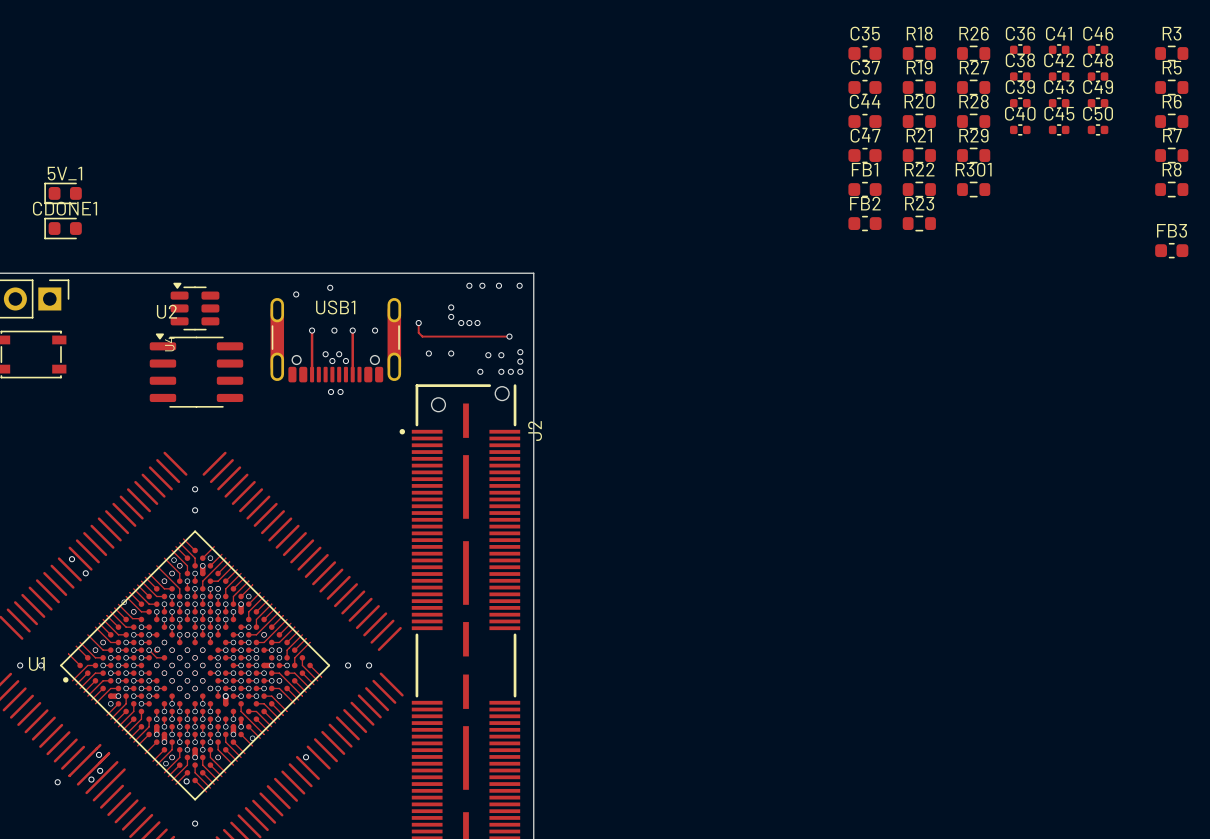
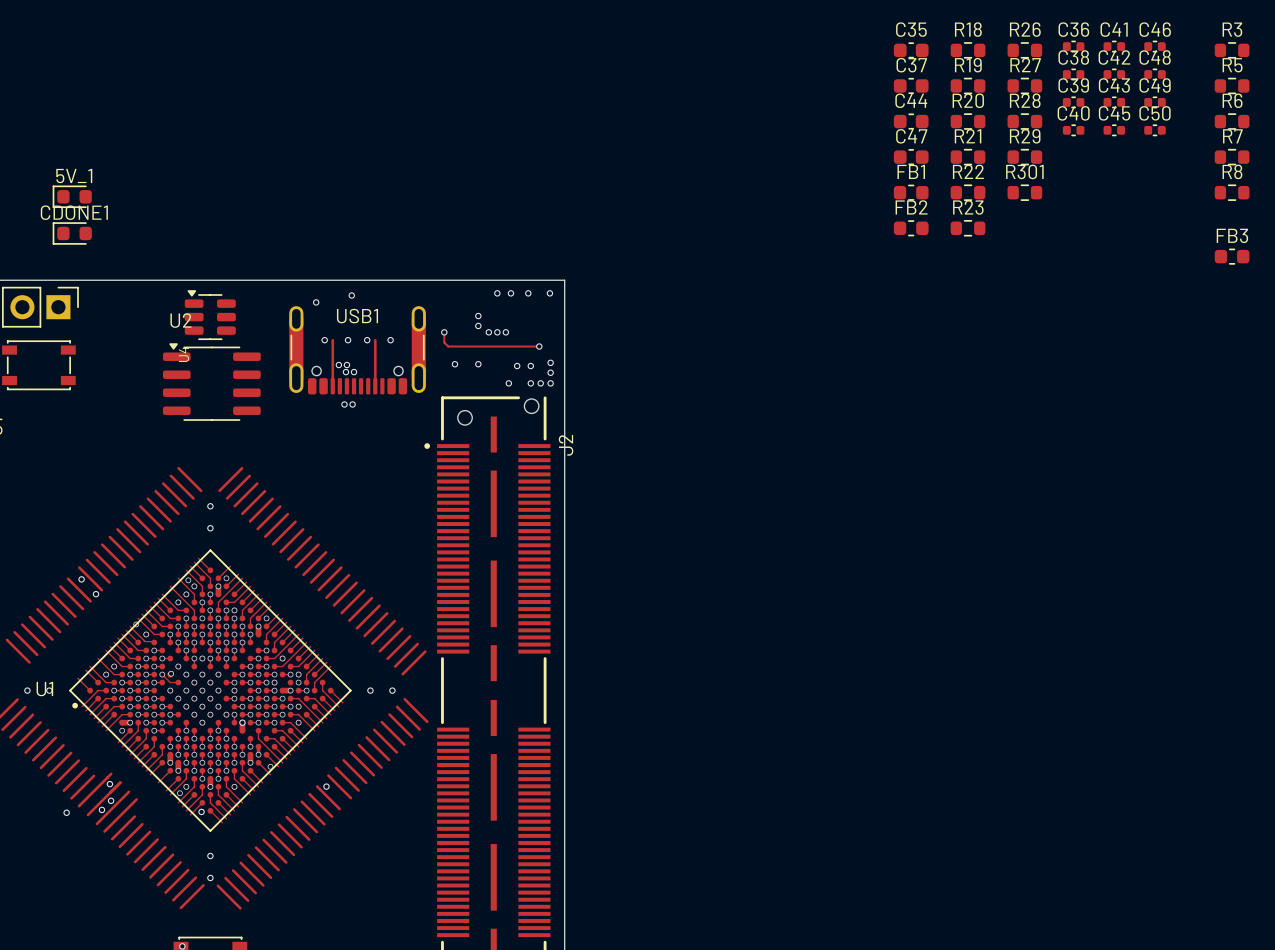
via: none -> (324, 340)
via: (312, 330) -> none
via: none -> (348, 340)
via: (334, 330) -> none
via: none -> (367, 340)
via: (352, 330) -> none
via: none -> (390, 340)
via: (375, 330) -> none
via: none -> (338, 365)
via: (339, 354) -> none
via: none -> (345, 372)
via: (345, 361) -> none
via: none -> (344, 404)
via: (340, 391) -> none

